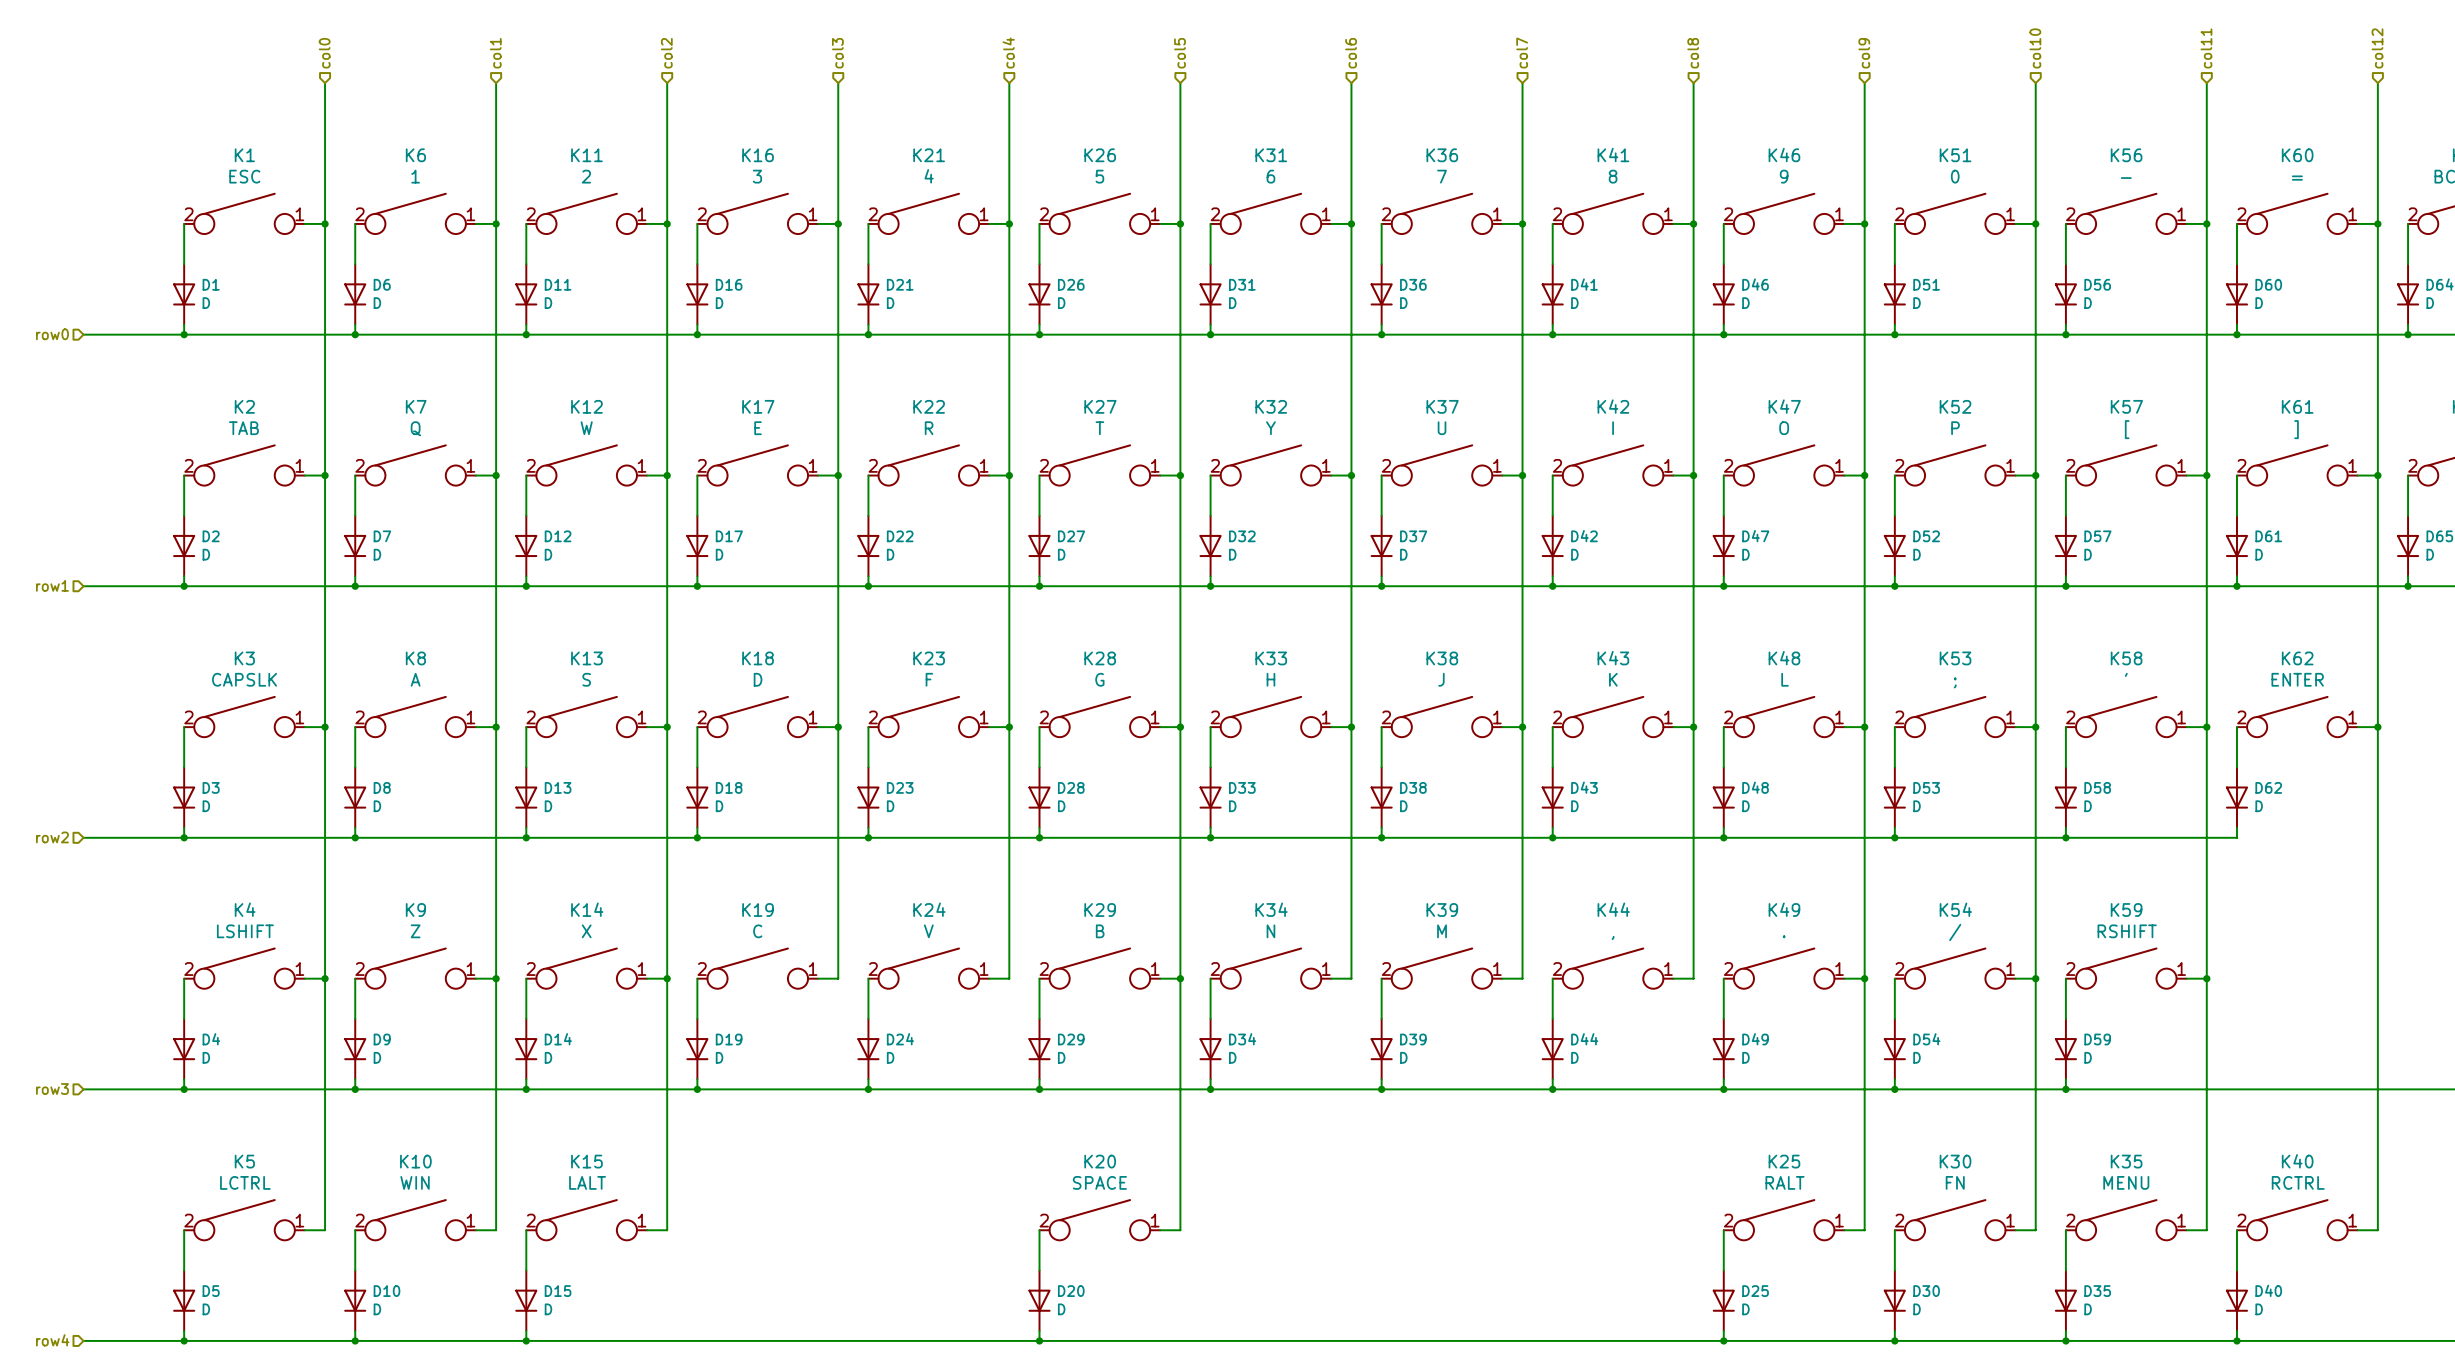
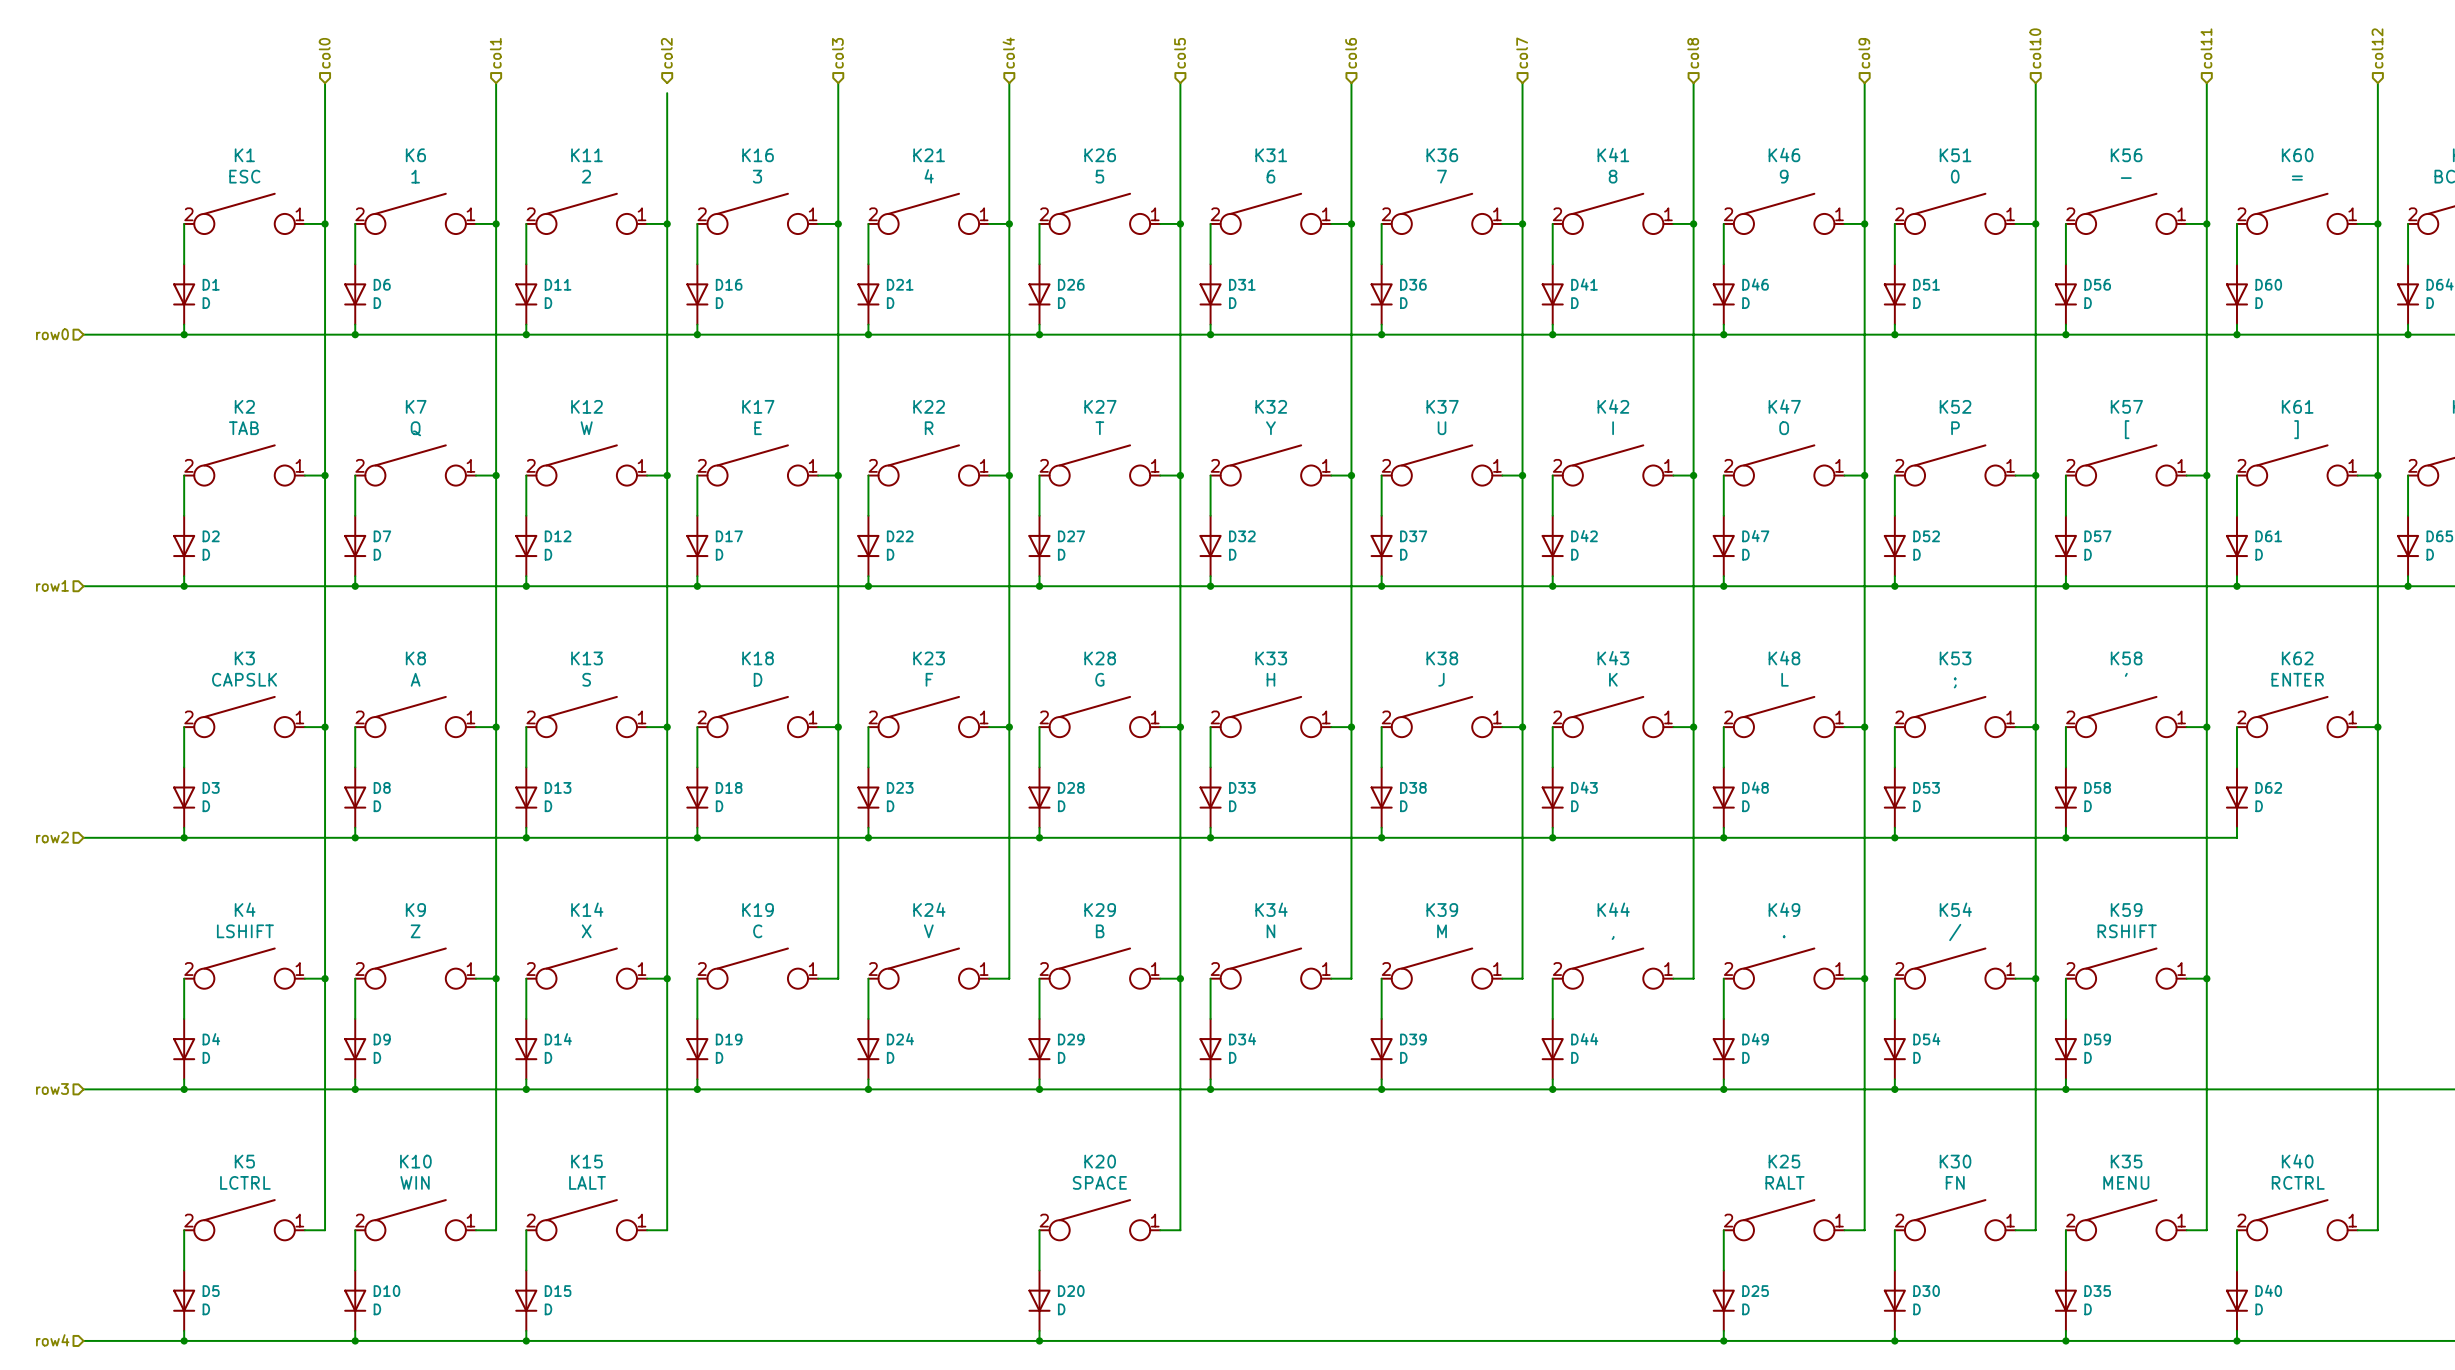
wire: (667, 83) (667, 93) -> none

